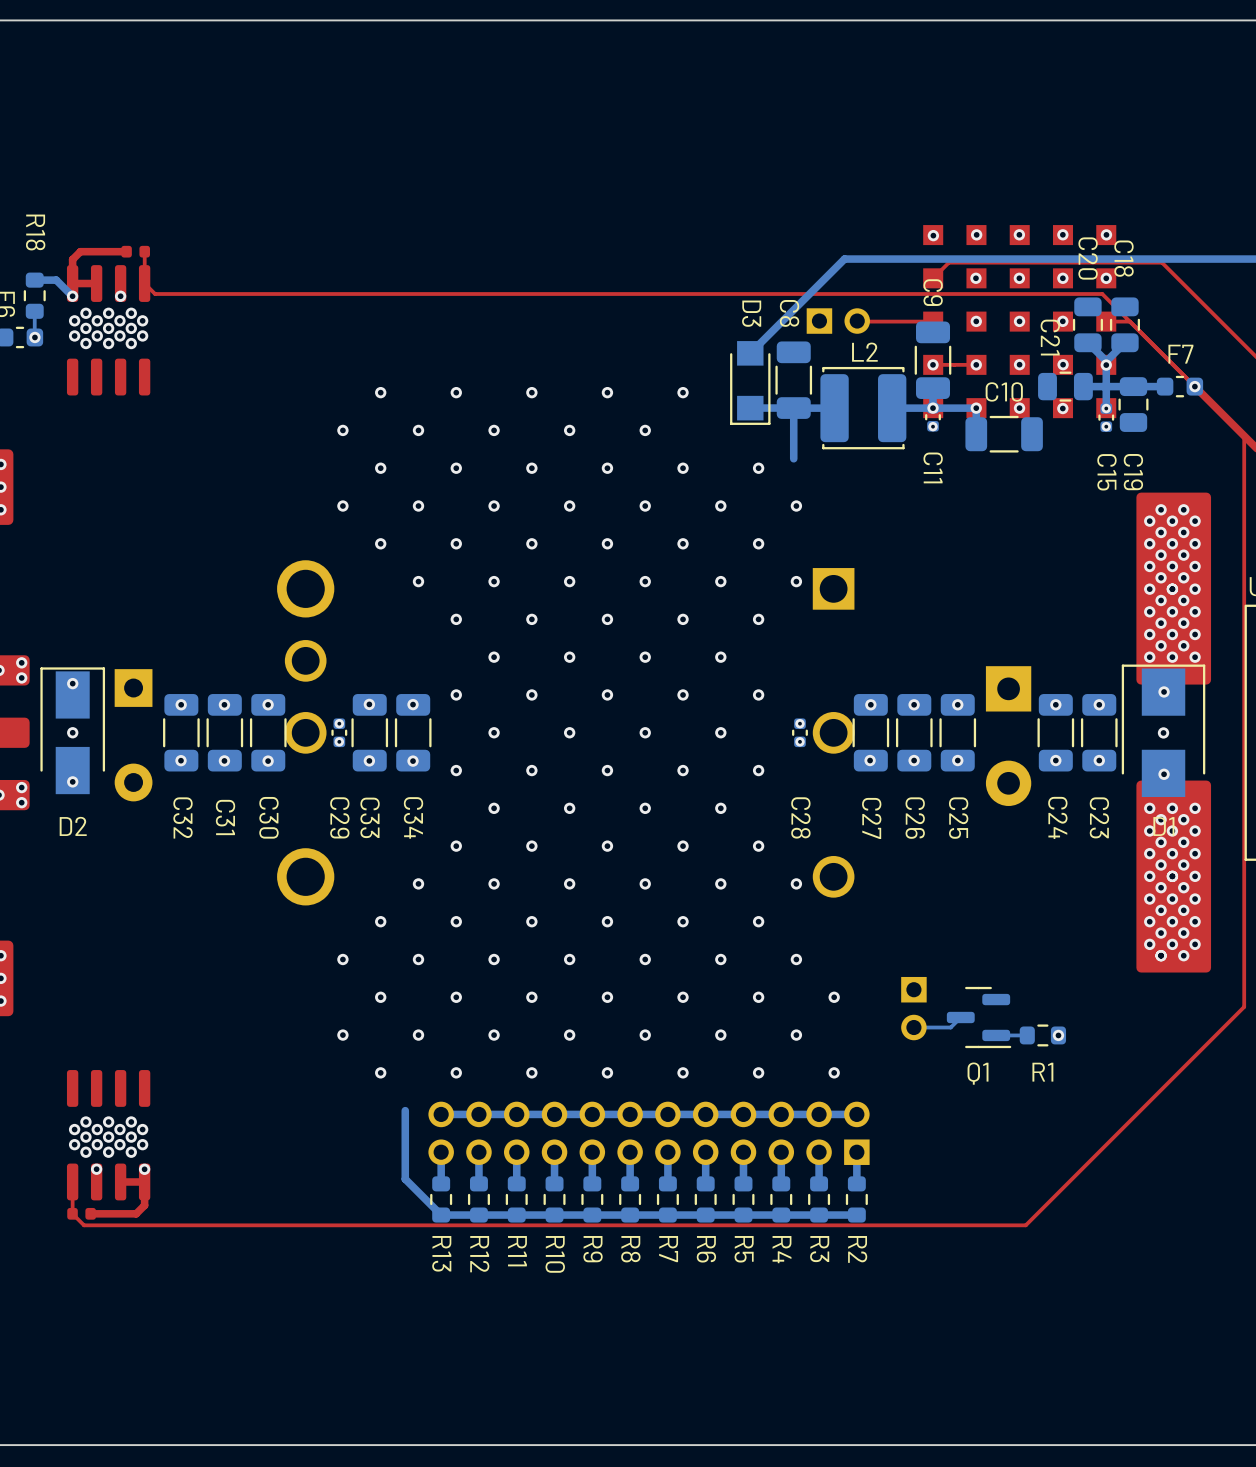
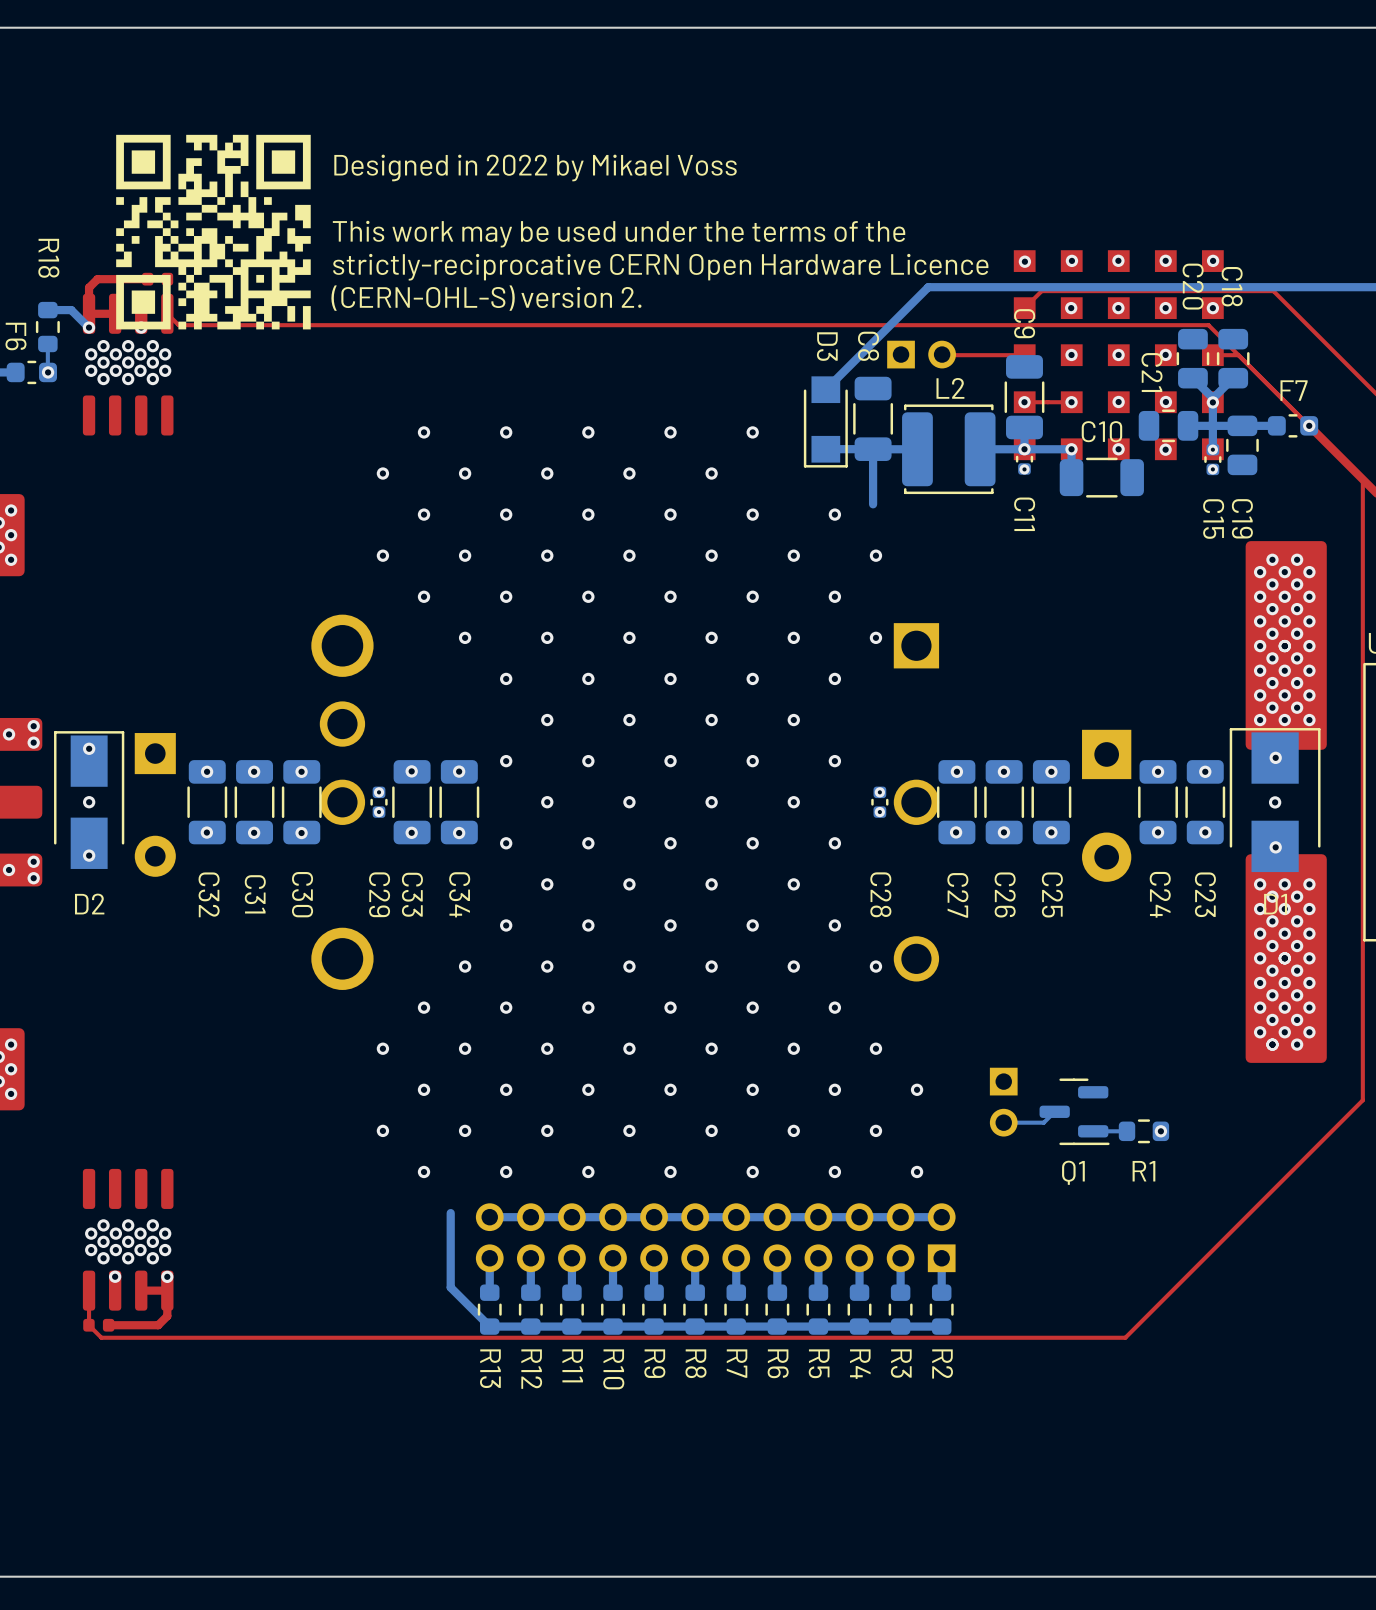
drawing: none -> [116, 134, 311, 330]
text: none -> Designed in 2022 by Mikael Voss (535, 168)
text: none -> This work may be used under the terms of the (619, 234)
text: none -> strictly‐reciprocative CERN Open Hardware Licence (660, 267)
text: none -> (CERN-OHL-S) version 2. (486, 298)

